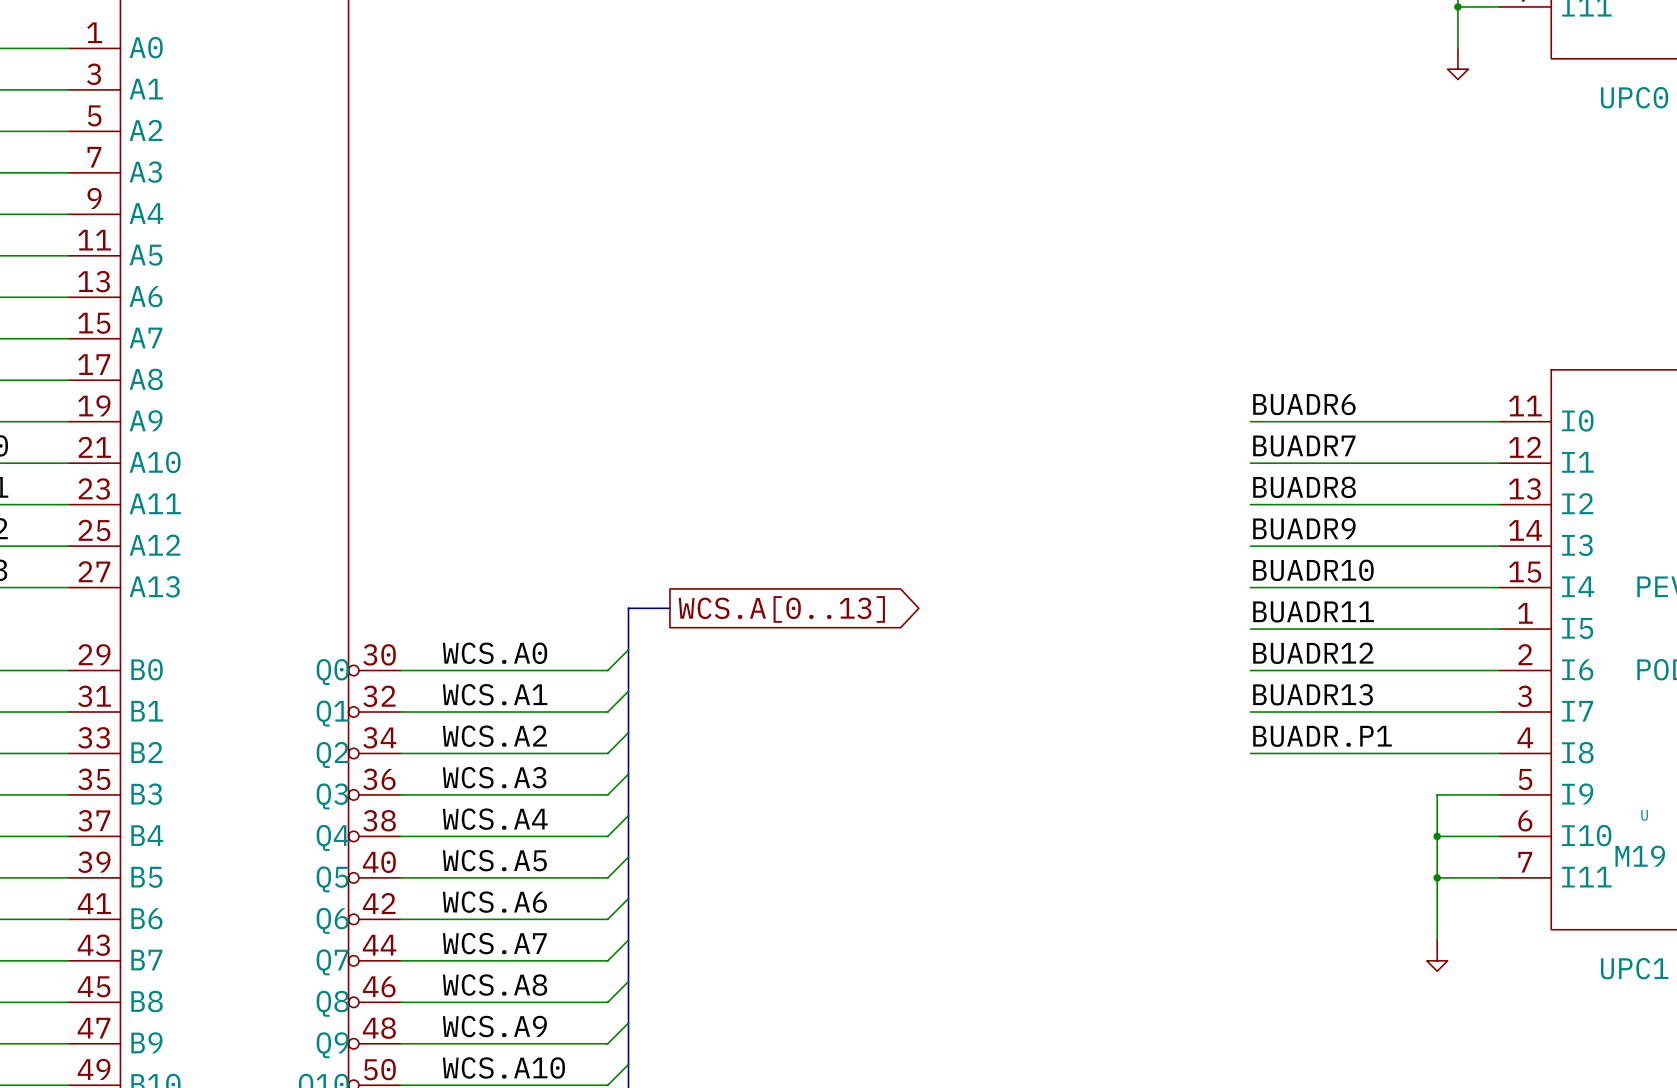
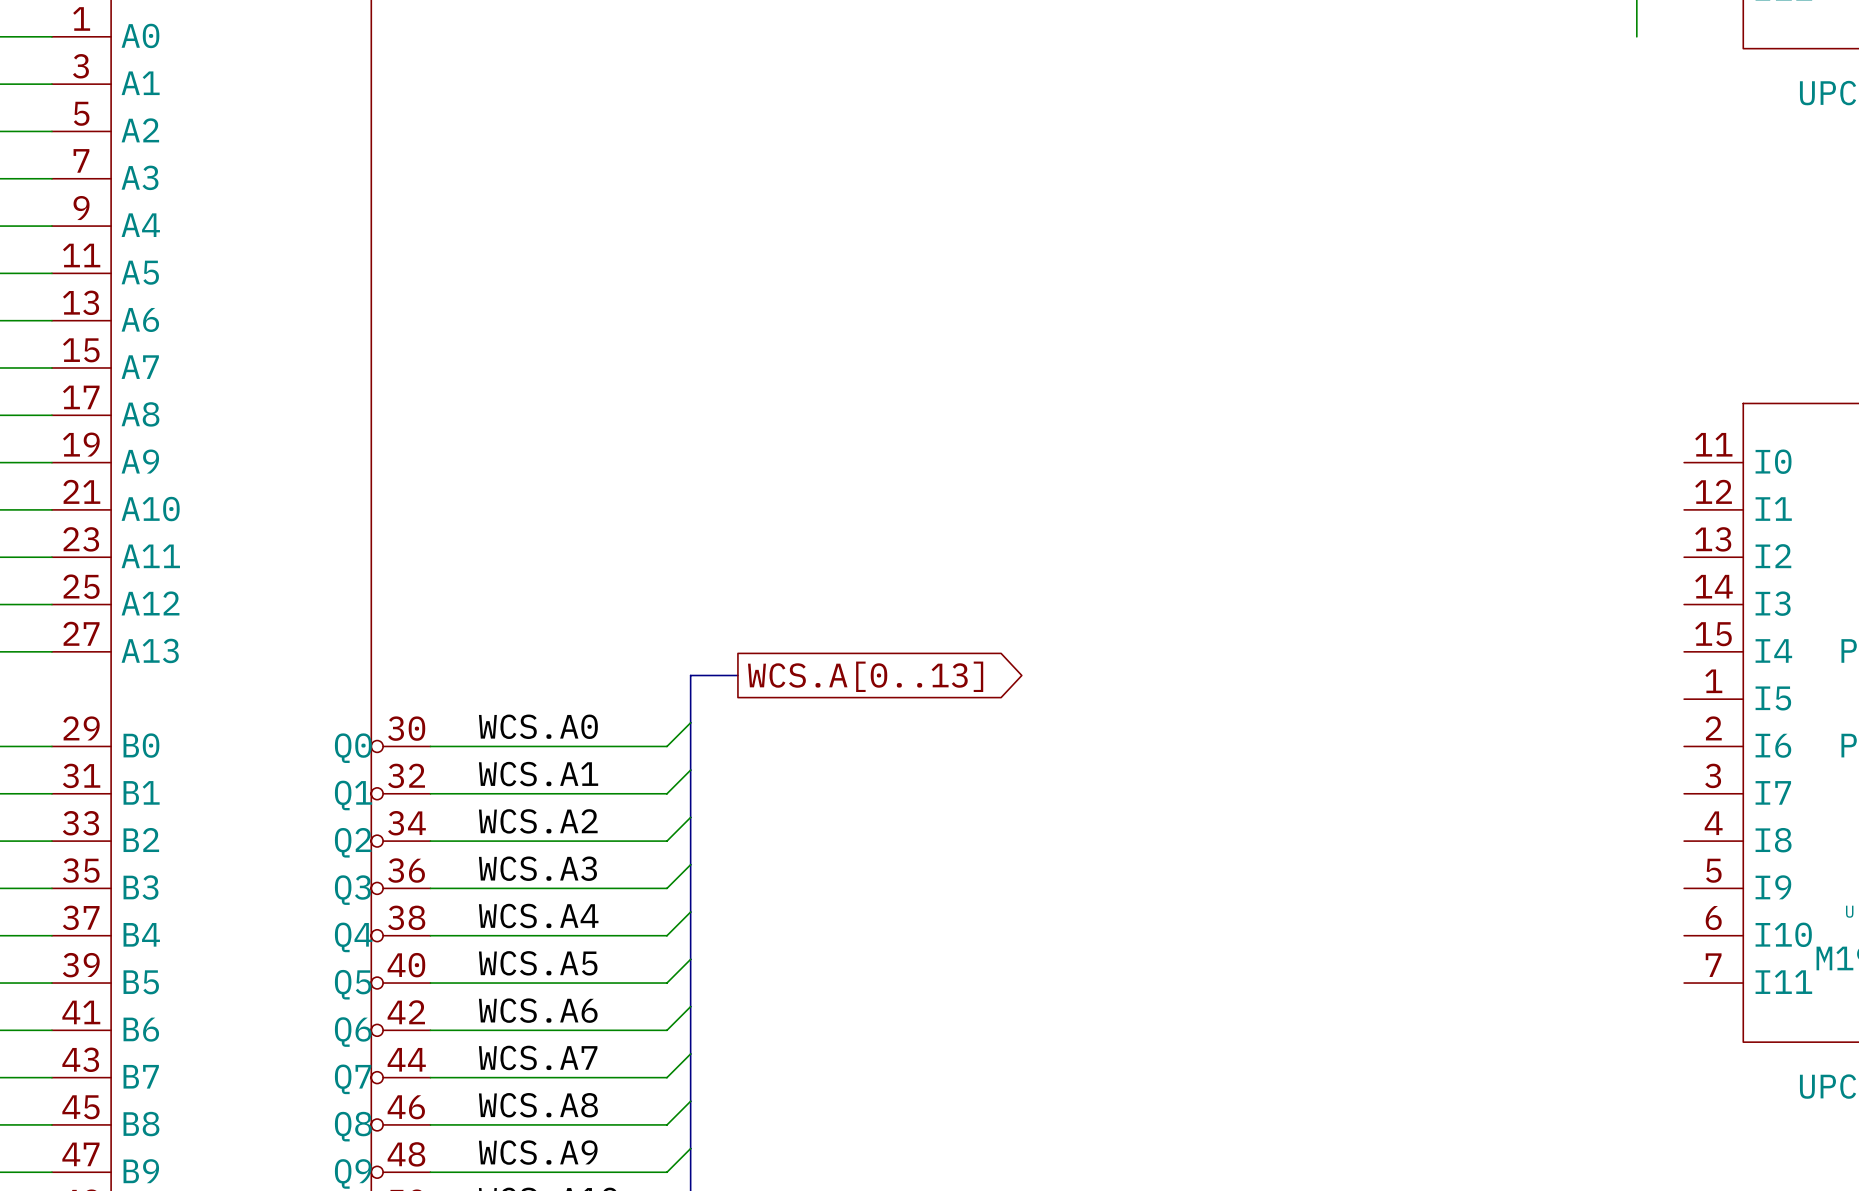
power symbol: (1457, 64) -> none
label: BUADR6 (1304, 404) -> none
wire: (1250, 421) (1499, 421) -> none
label: BUADR7 (1304, 446) -> none
wire: (1250, 463) (1499, 463) -> none
label: BUADR8 (1304, 487) -> none
wire: (1250, 504) (1499, 504) -> none
label: BUADR9 (1304, 528) -> none
wire: (1250, 546) (1499, 546) -> none
label: BUADR10 (1313, 570) -> none
wire: (1250, 587) (1499, 587) -> none
label: BUADR11 (1313, 611) -> none
wire: (1250, 629) (1499, 629) -> none
label: BUADR12 (1313, 653) -> none
wire: (1250, 670) (1499, 670) -> none
label: BUADR13 (1313, 694) -> none
wire: (1250, 712) (1499, 712) -> none
label: BUADR.P1 (1322, 736) -> none
wire: (1250, 753) (1499, 753) -> none
wire: (1499, 794) (1437, 794) (1437, 940) -> none
wire: (1437, 836) (1499, 836) -> none
junction: (1437, 836) -> none
wire: (1437, 877) (1499, 877) -> none
junction: (1437, 877) -> none
power symbol: (1437, 955) -> none

